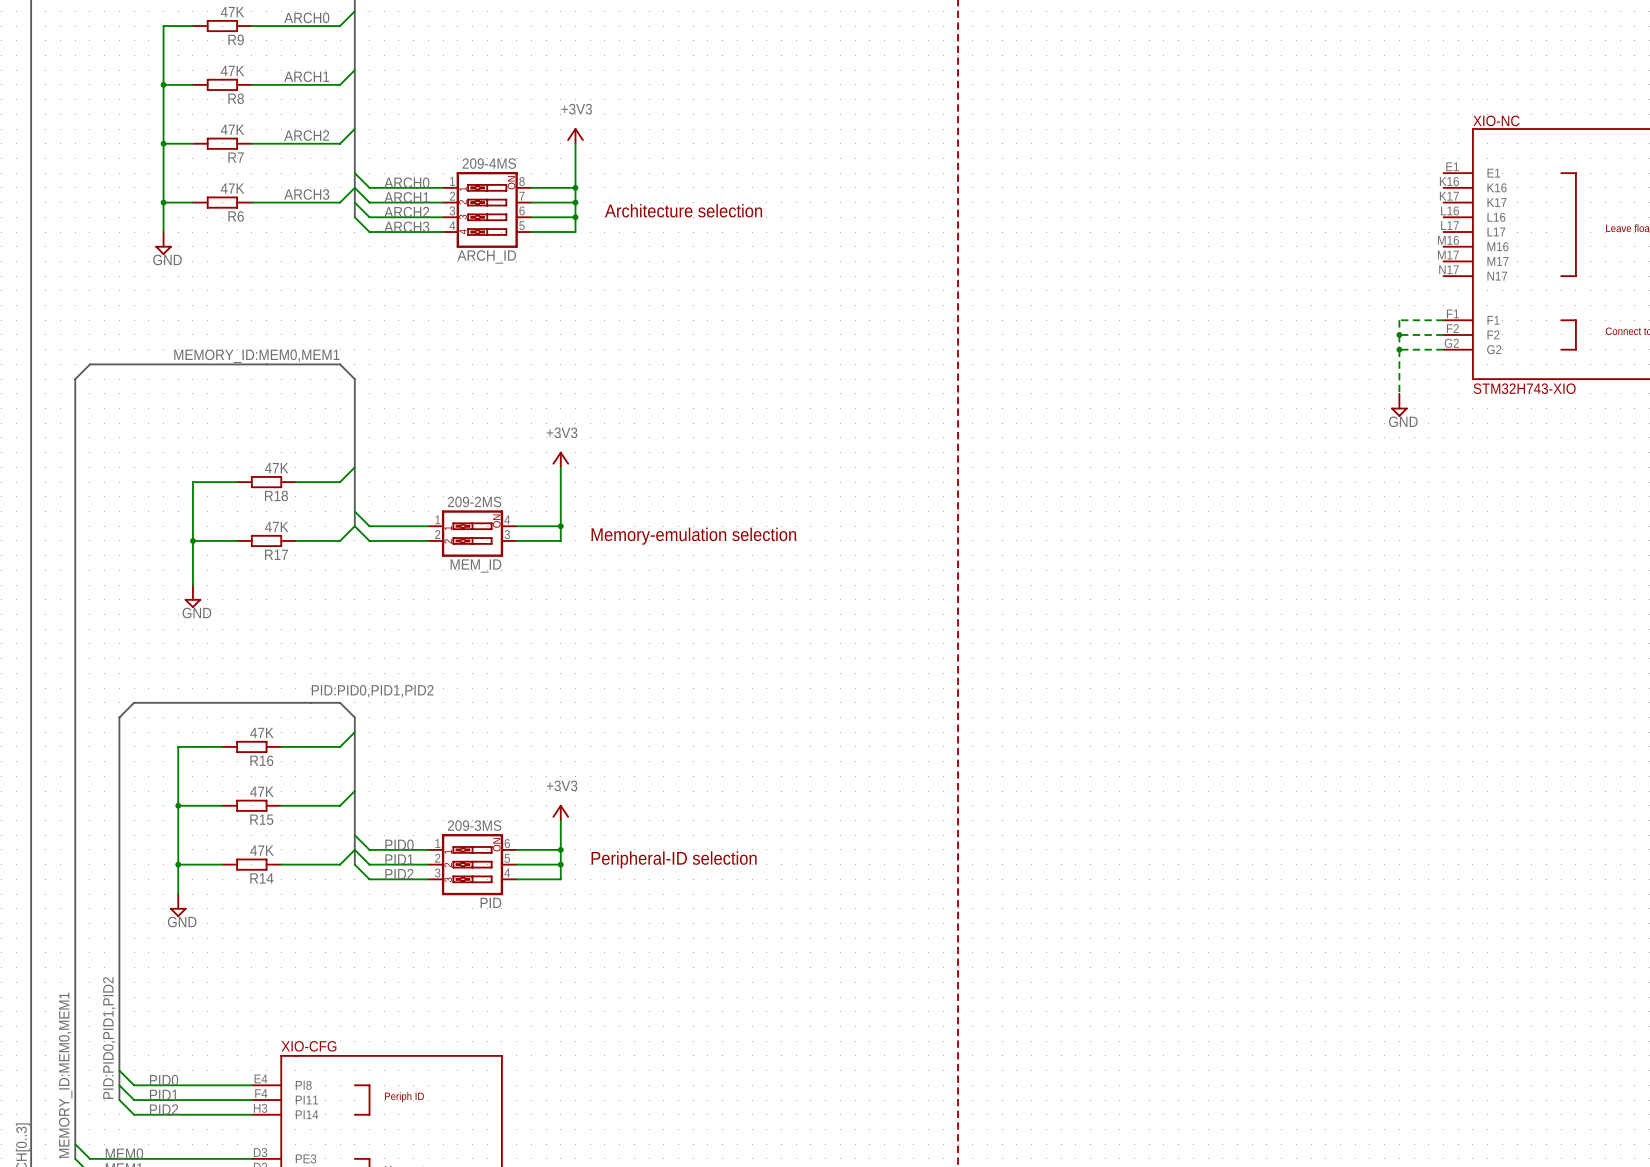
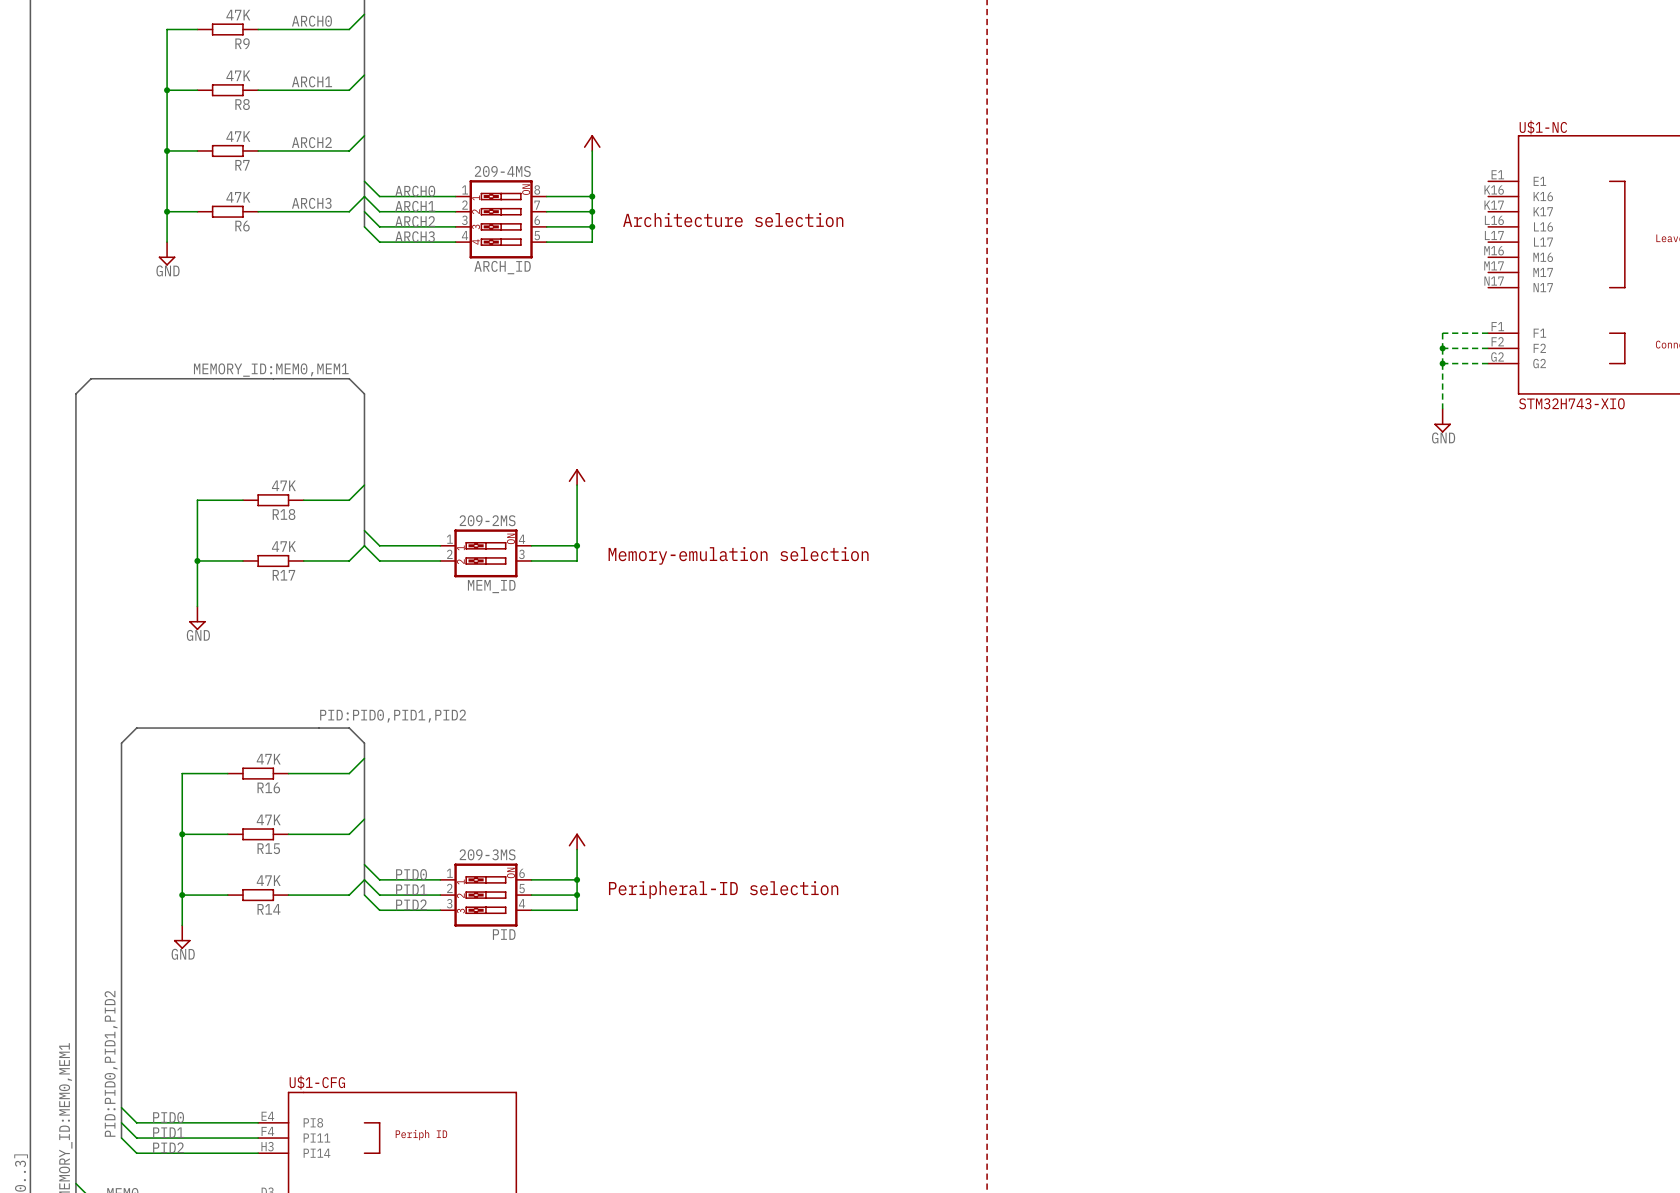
label: +3V3 (576, 109) -> none
XIO-NC name: XIO-NC (1496, 120) -> U$1-NC (1543, 127)
label: +3V3 (562, 432) -> none
label: +3V3 (562, 785) -> none
XIO-CFG name: XIO-CFG (308, 1046) -> U$1-CFG (317, 1082)

